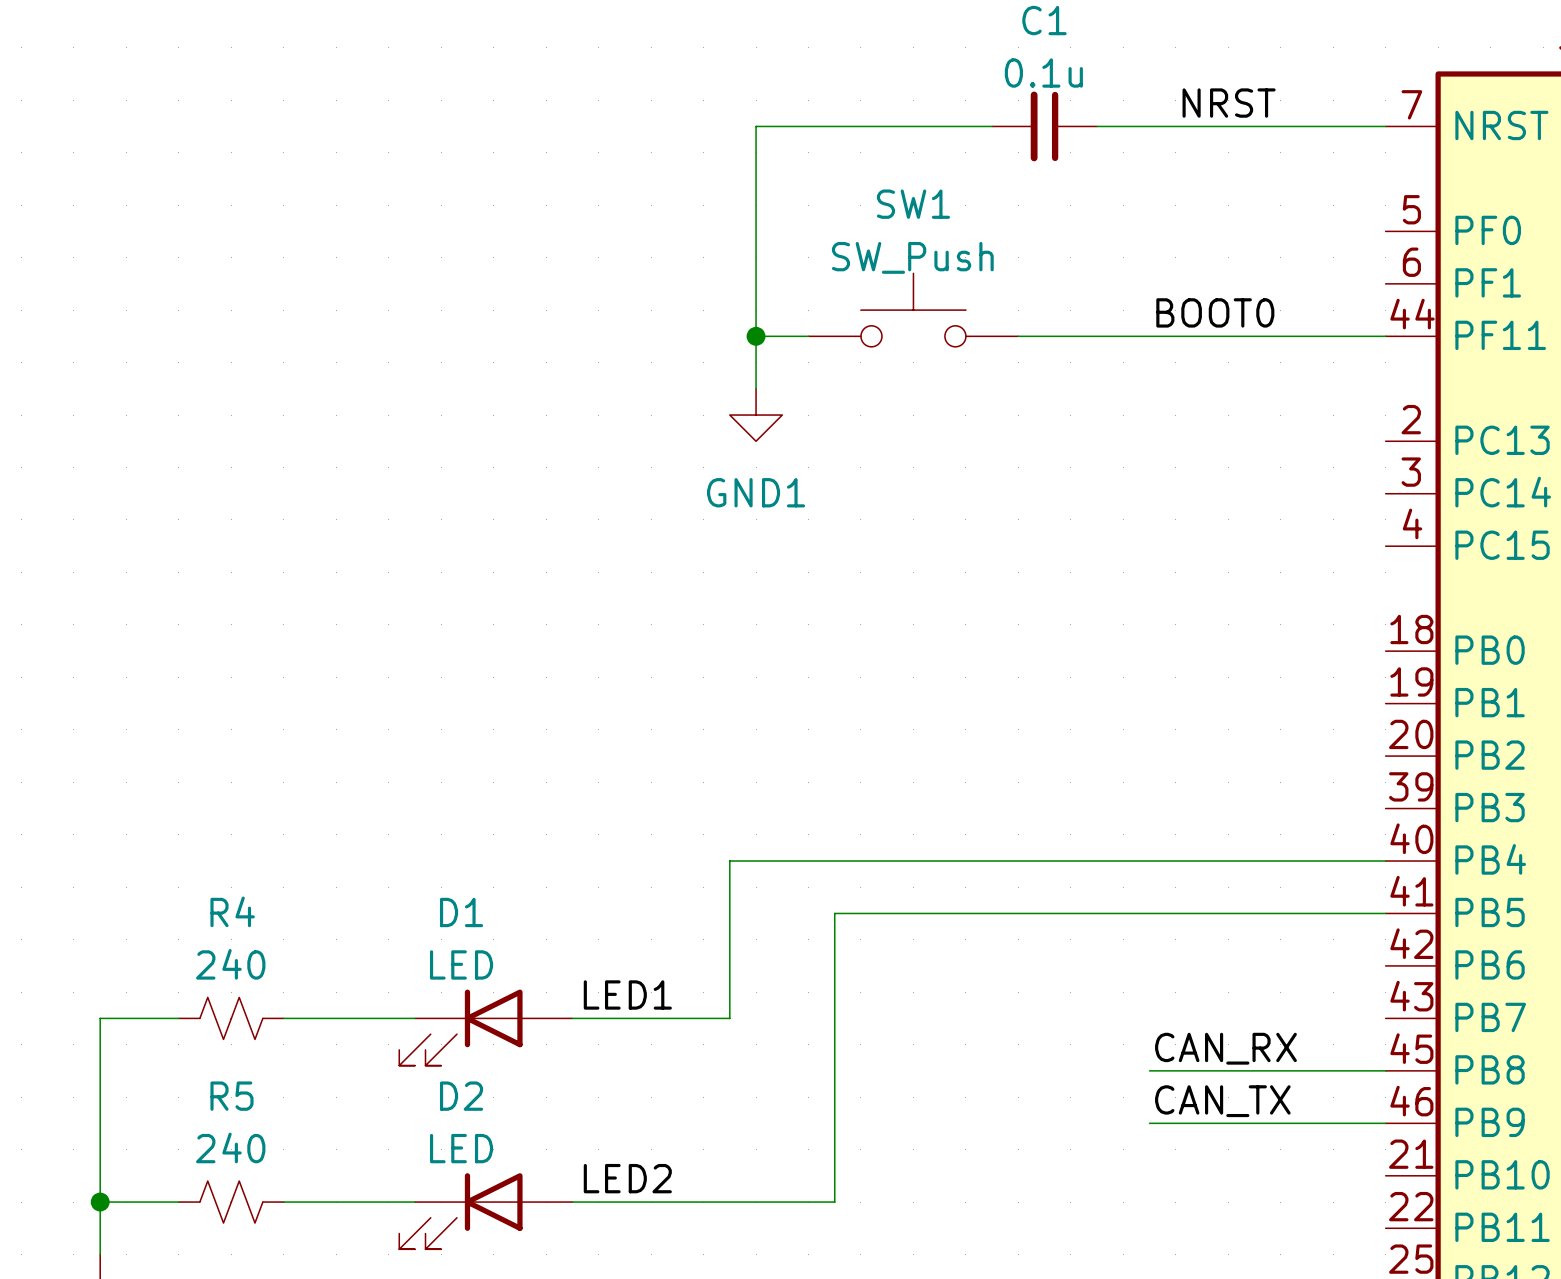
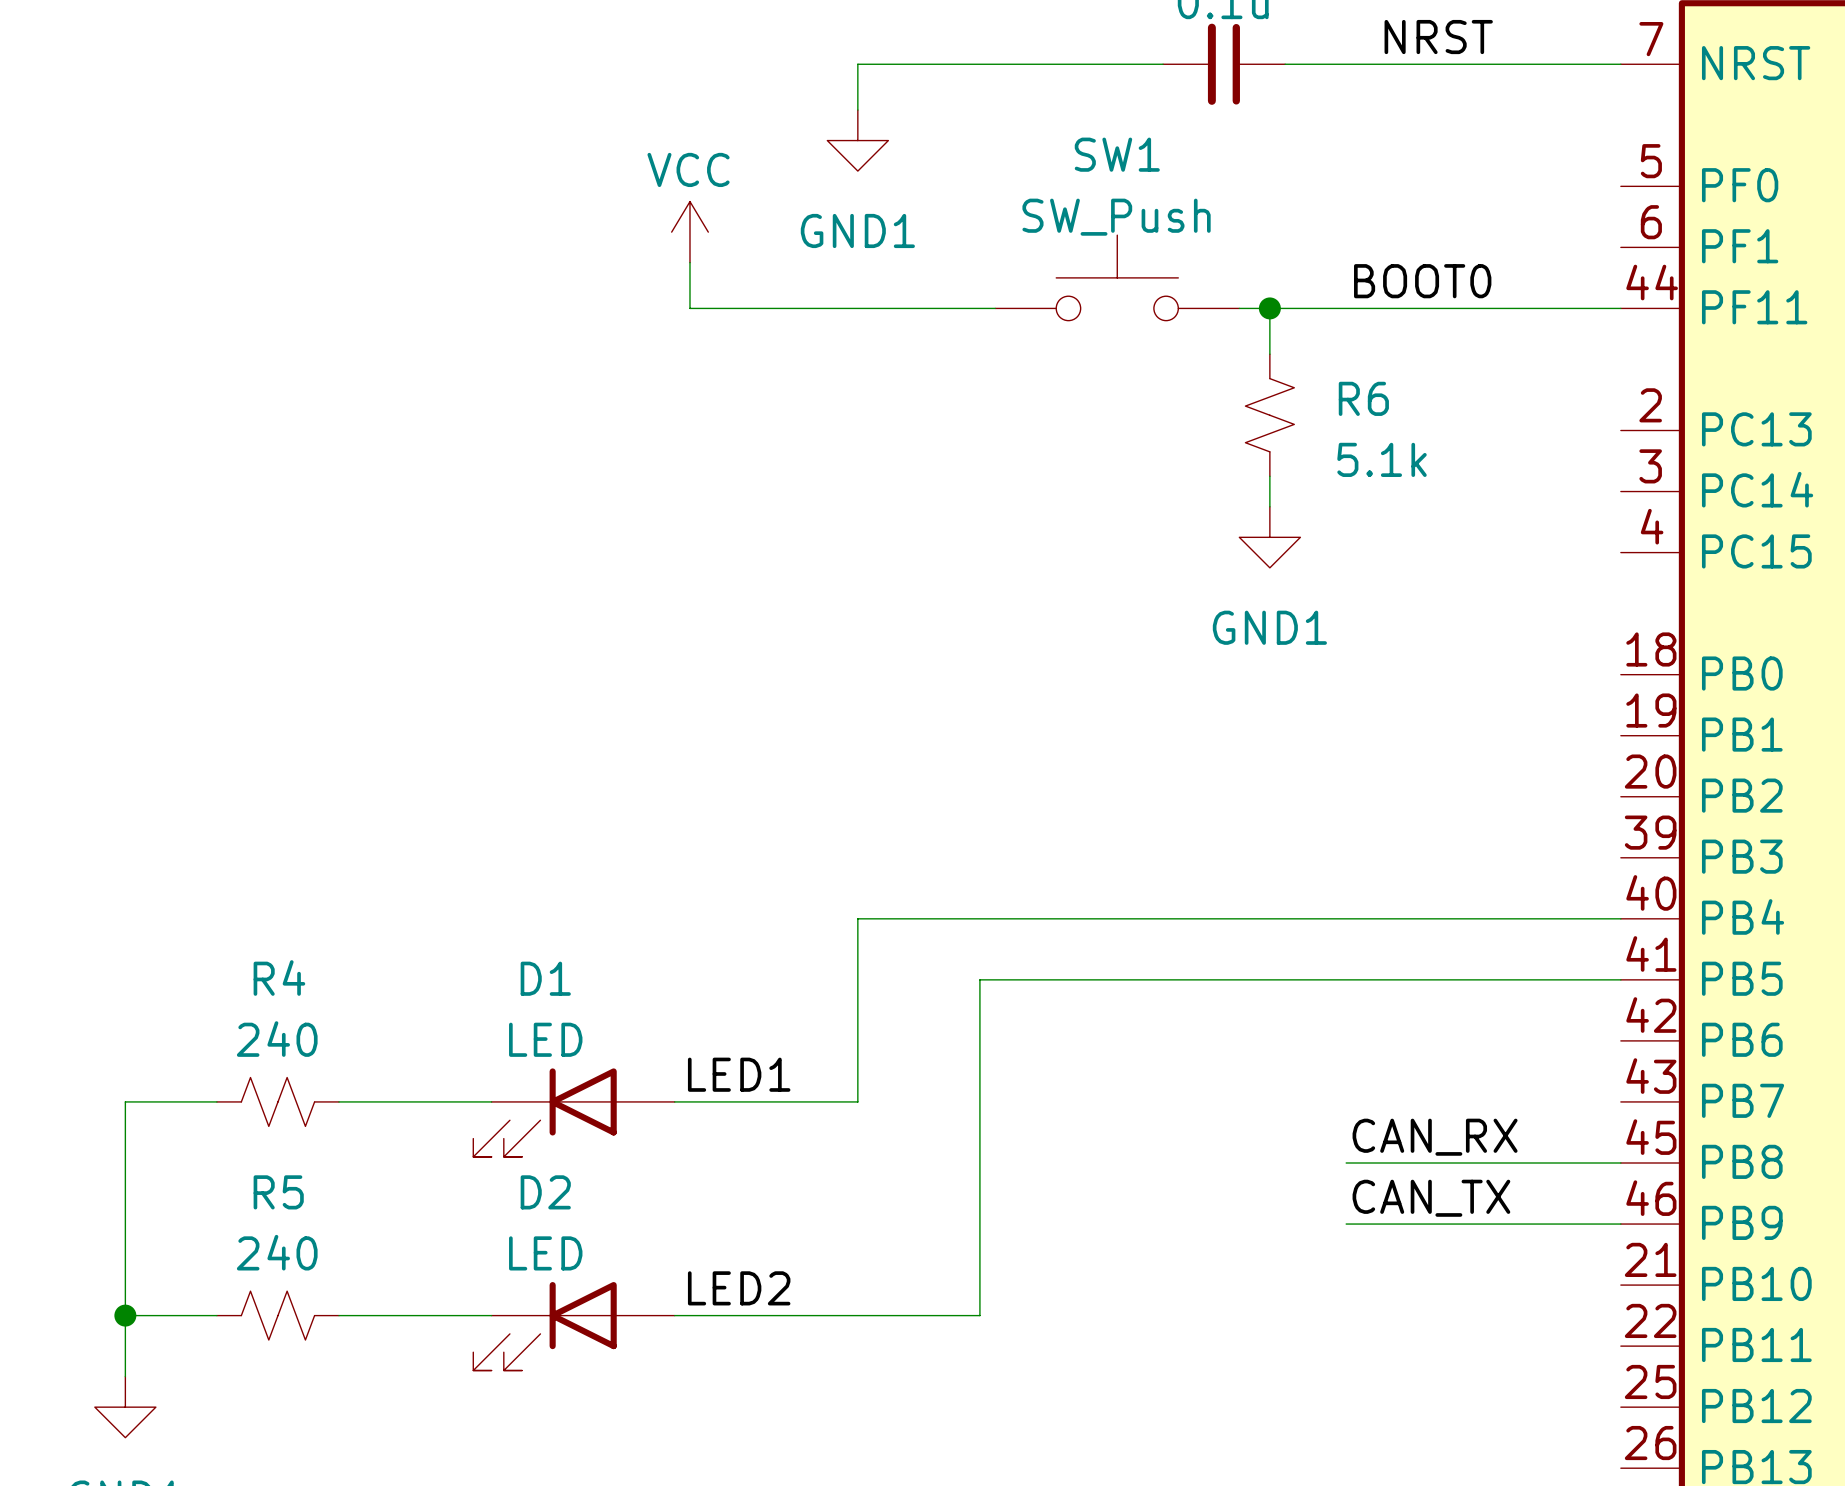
wire: (756, 126) (756, 388) -> (888, 64) (857, 64) (857, 110)
power symbol: none -> GND1 (857, 140)
power symbol: none -> VCC (689, 232)
wire: none -> (689, 262) (689, 308) (888, 308)
SW1 position: (913, 310) -> (1117, 277)
junction: (756, 336) -> none
wire: none -> (1269, 308) (1269, 354)
junction: none -> (1269, 308)
power symbol: GND1 (756, 415) -> none
R6: none -> 5.1k (1269, 415)
wire: none -> (1269, 476) (1269, 506)
power symbol: none -> GND1 (1269, 537)

